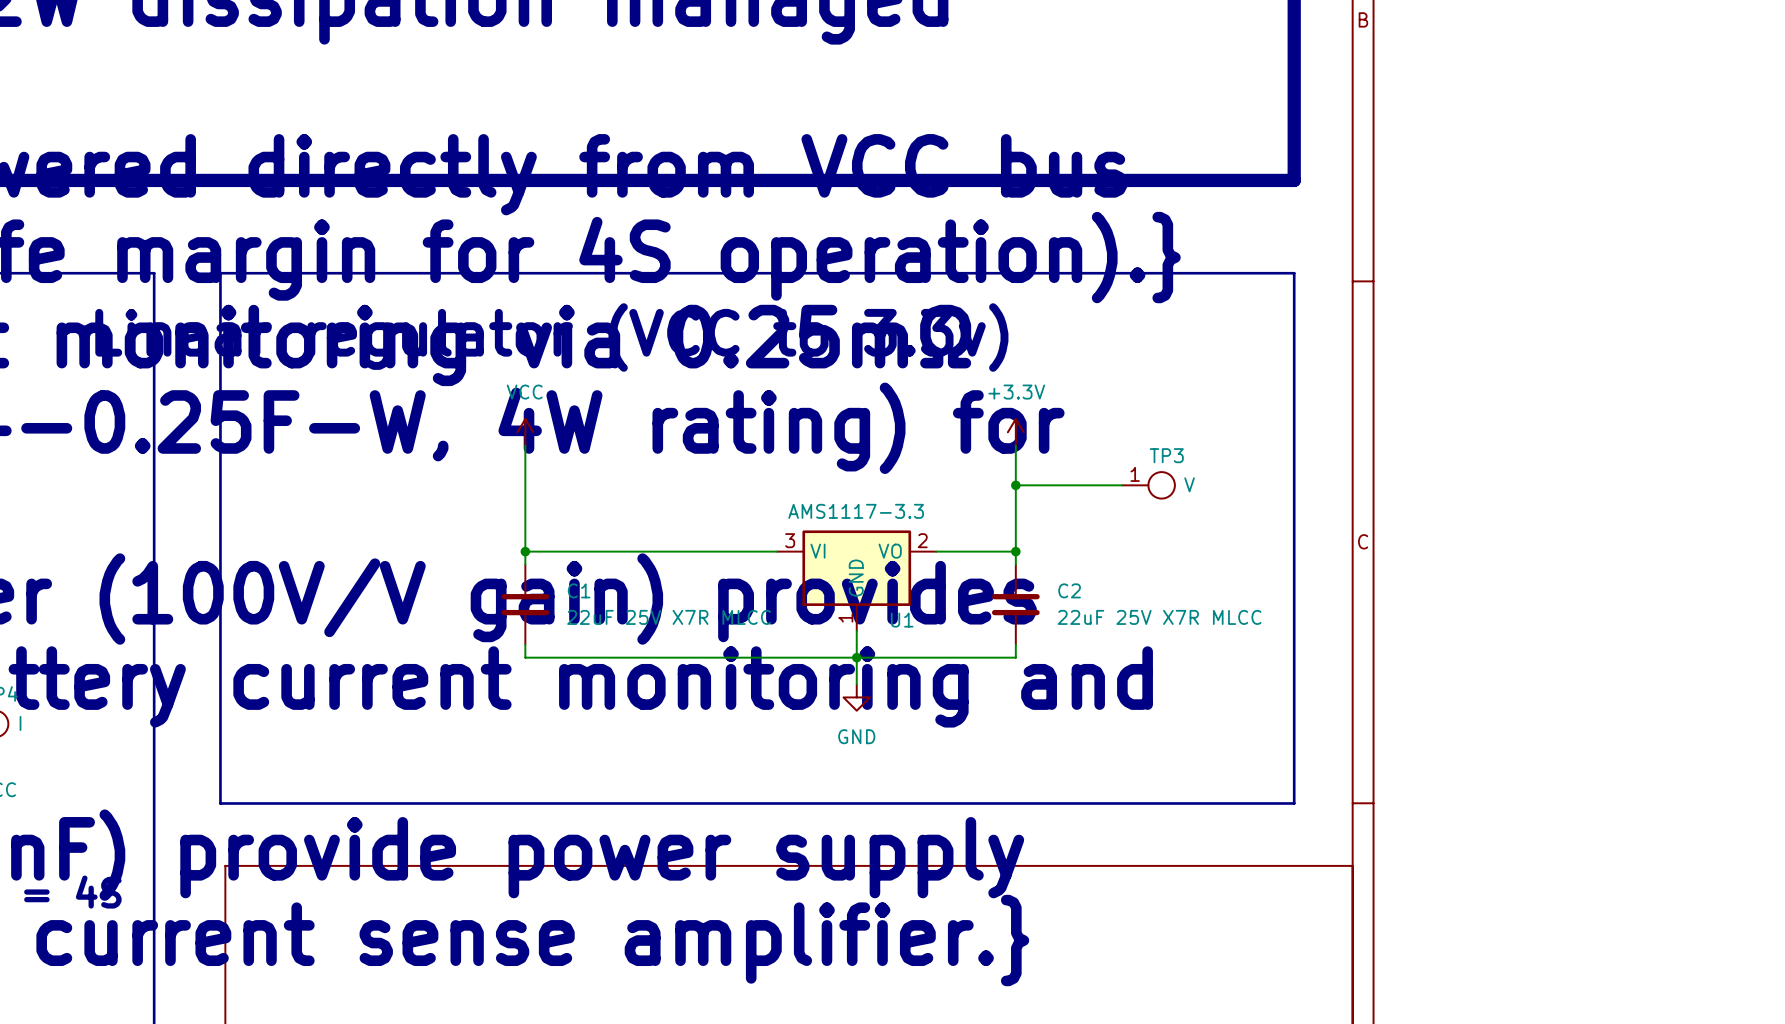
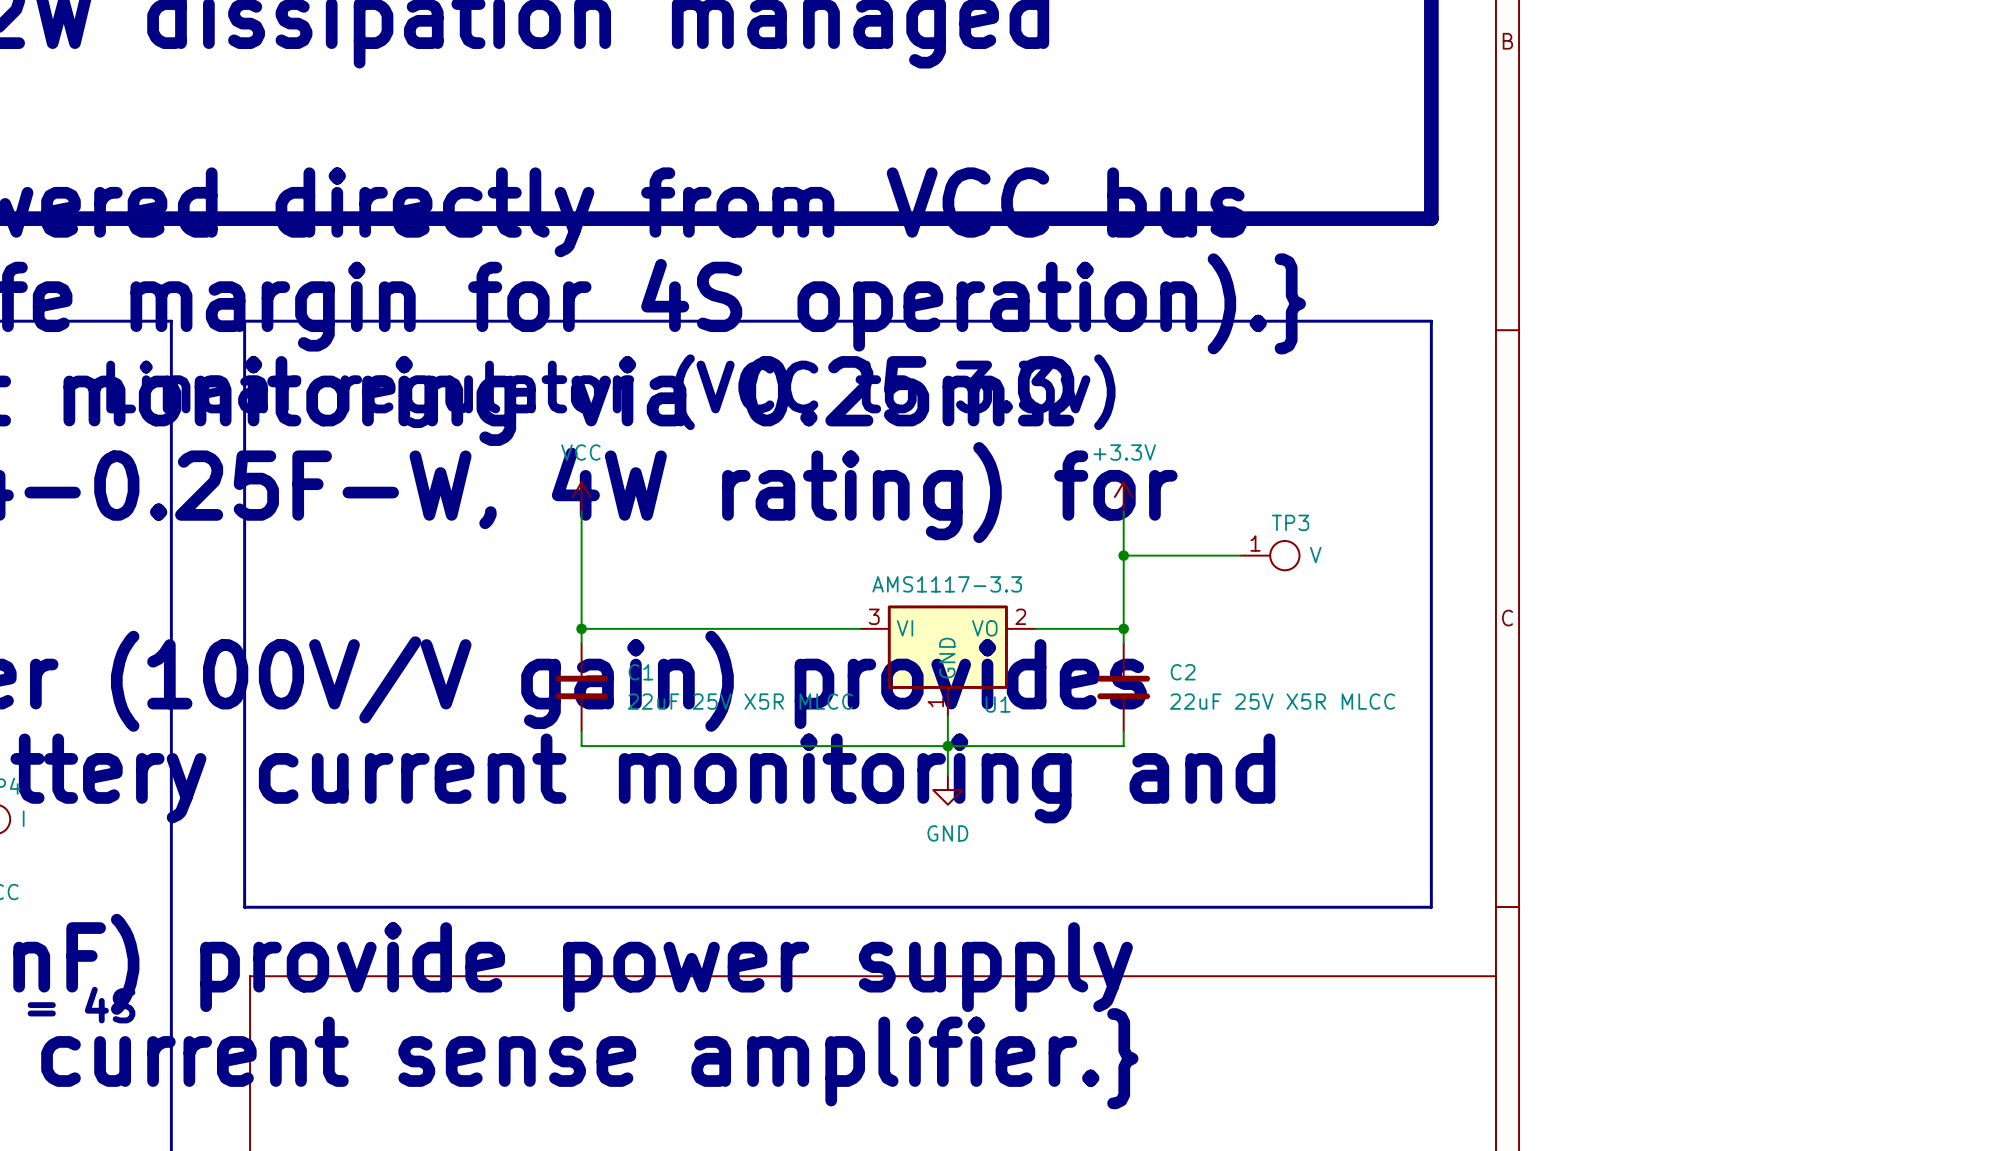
C1 value: 22uF 25V X7R MLCC (669, 617) -> 22uF 25V X5R MLCC (740, 701)
C2 value: 22uF 25V X7R MLCC (1159, 617) -> 22uF 25V X5R MLCC (1282, 701)

